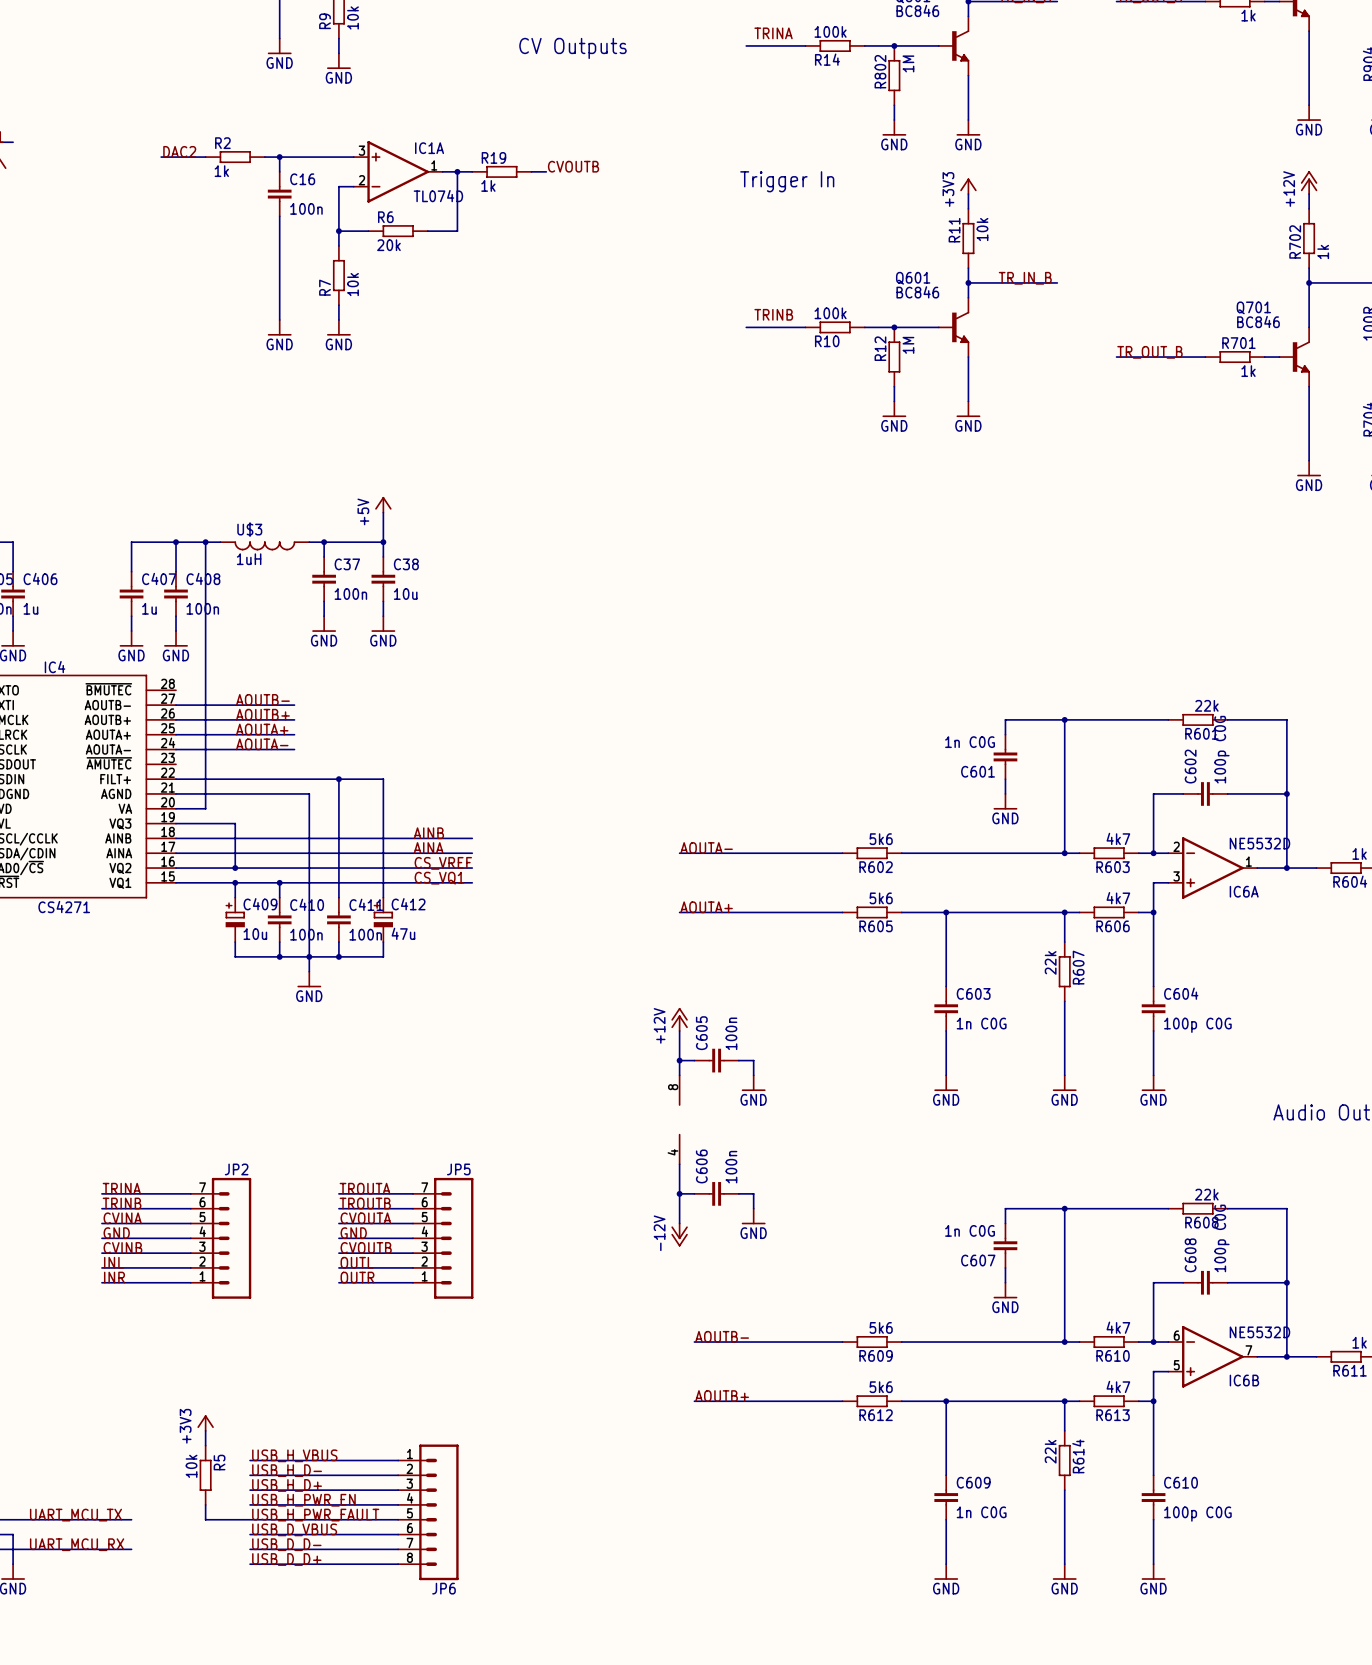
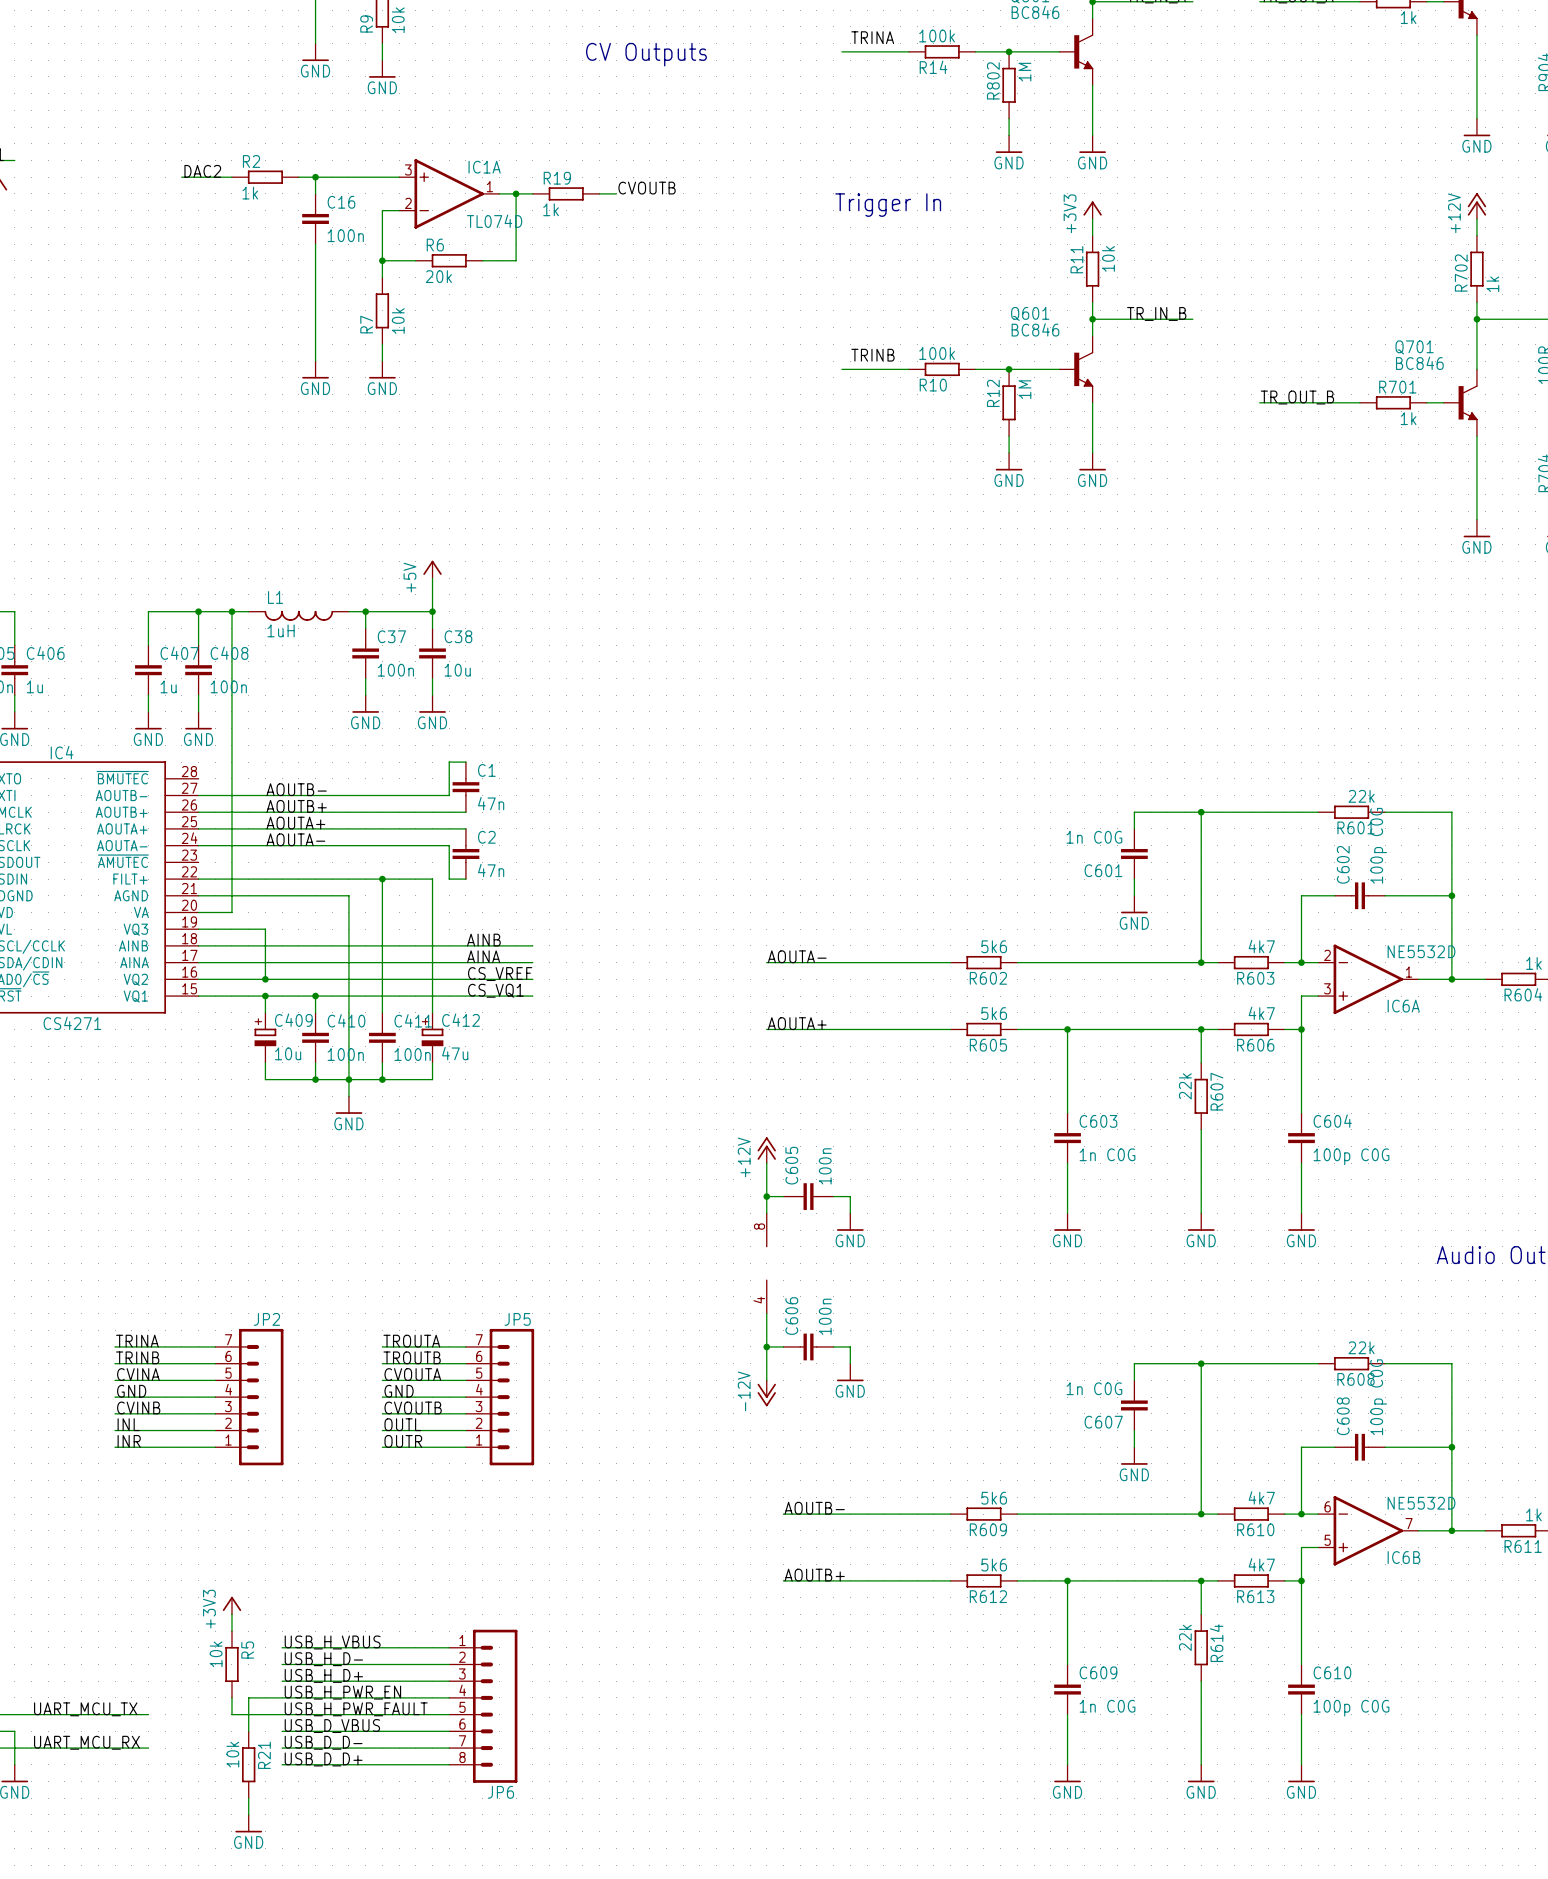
U$3 name: U$3 (249, 529) -> L1 (275, 597)
wire: none -> (465, 762) (449, 762) (449, 795) (332, 795)
C1: none -> 47n (465, 787)
wire: none -> (332, 812) (465, 812)
wire: none -> (332, 828) (465, 828)
wire: none -> (332, 845) (449, 845) (449, 879) (465, 879)
C2: none -> 47n (465, 854)
wire: none -> (282, 1697) (248, 1697) (248, 1731)
R21: none -> 10k (248, 1764)
wire: none -> (248, 1798) (248, 1814)
power symbol: none -> GND (248, 1823)

